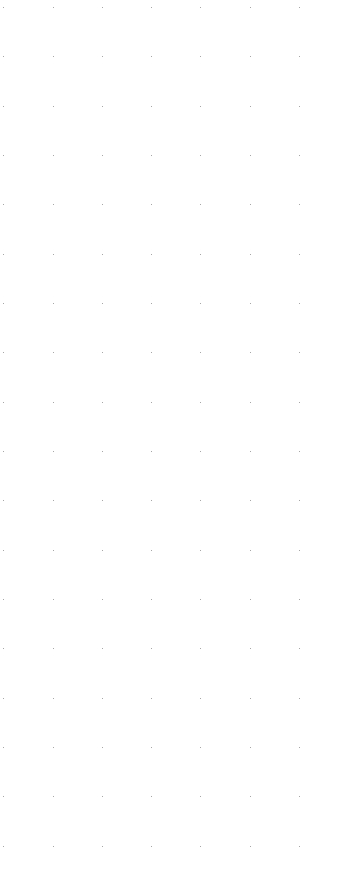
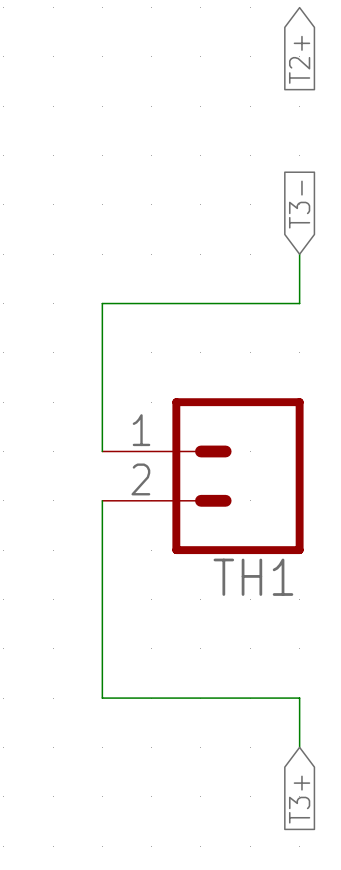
global label: none -> T2+ (299, 59)
global label: none -> T3- (299, 204)
wire: none -> (299, 254) (299, 303) (102, 303) (102, 451)
TH1: none -> (202, 476)
wire: none -> (102, 500) (102, 698) (299, 698) (299, 747)
global label: none -> T3+ (299, 799)

